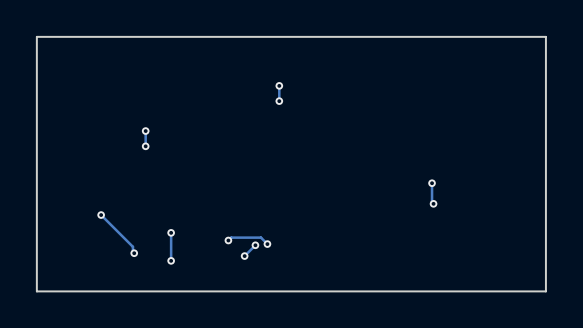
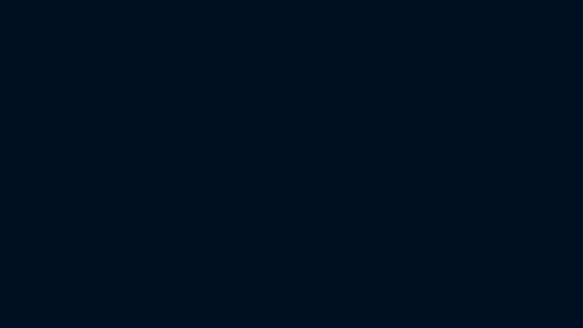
board edge: (545, 36) (36, 36) (36, 291) (545, 291) (545, 36) -> none
track: (279, 85) (279, 101) -> none
via: (279, 85) -> none
via: (279, 101) -> none
track: (145, 131) (145, 146) -> none
via: (145, 131) -> none
via: (145, 146) -> none
track: (432, 183) (433, 203) -> none
via: (432, 183) -> none
via: (433, 203) -> none
track: (101, 215) (132, 246) (134, 253) -> none
via: (101, 215) -> none
track: (171, 232) (171, 260) -> none
via: (171, 232) -> none
track: (228, 240) (231, 237) (260, 237) (267, 244) -> none
via: (228, 240) -> none
via: (267, 244) -> none
track: (255, 245) (244, 256) -> none
via: (255, 245) -> none
via: (134, 253) -> none
via: (244, 256) -> none
via: (171, 260) -> none

